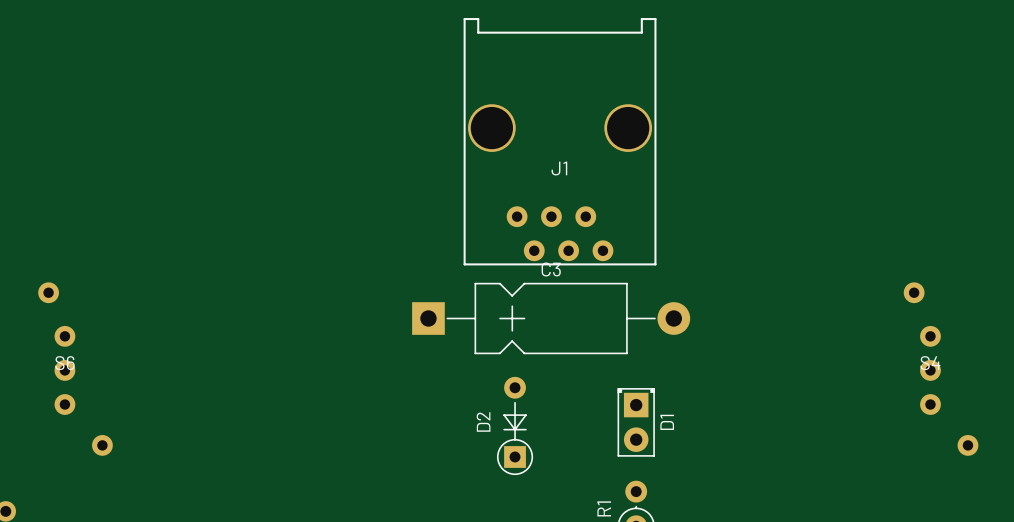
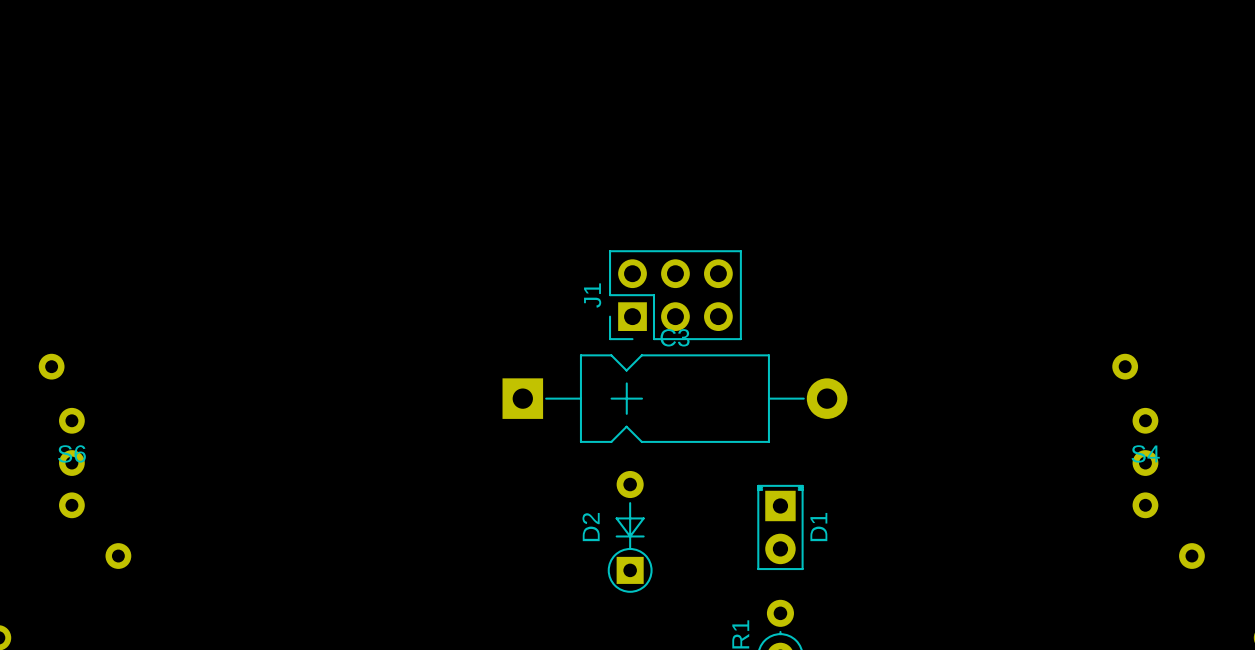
J1 footprint: [463, 18, 657, 266] -> [609, 250, 742, 341]
J1 name position: J1 (559, 168) -> J1 (592, 295)

